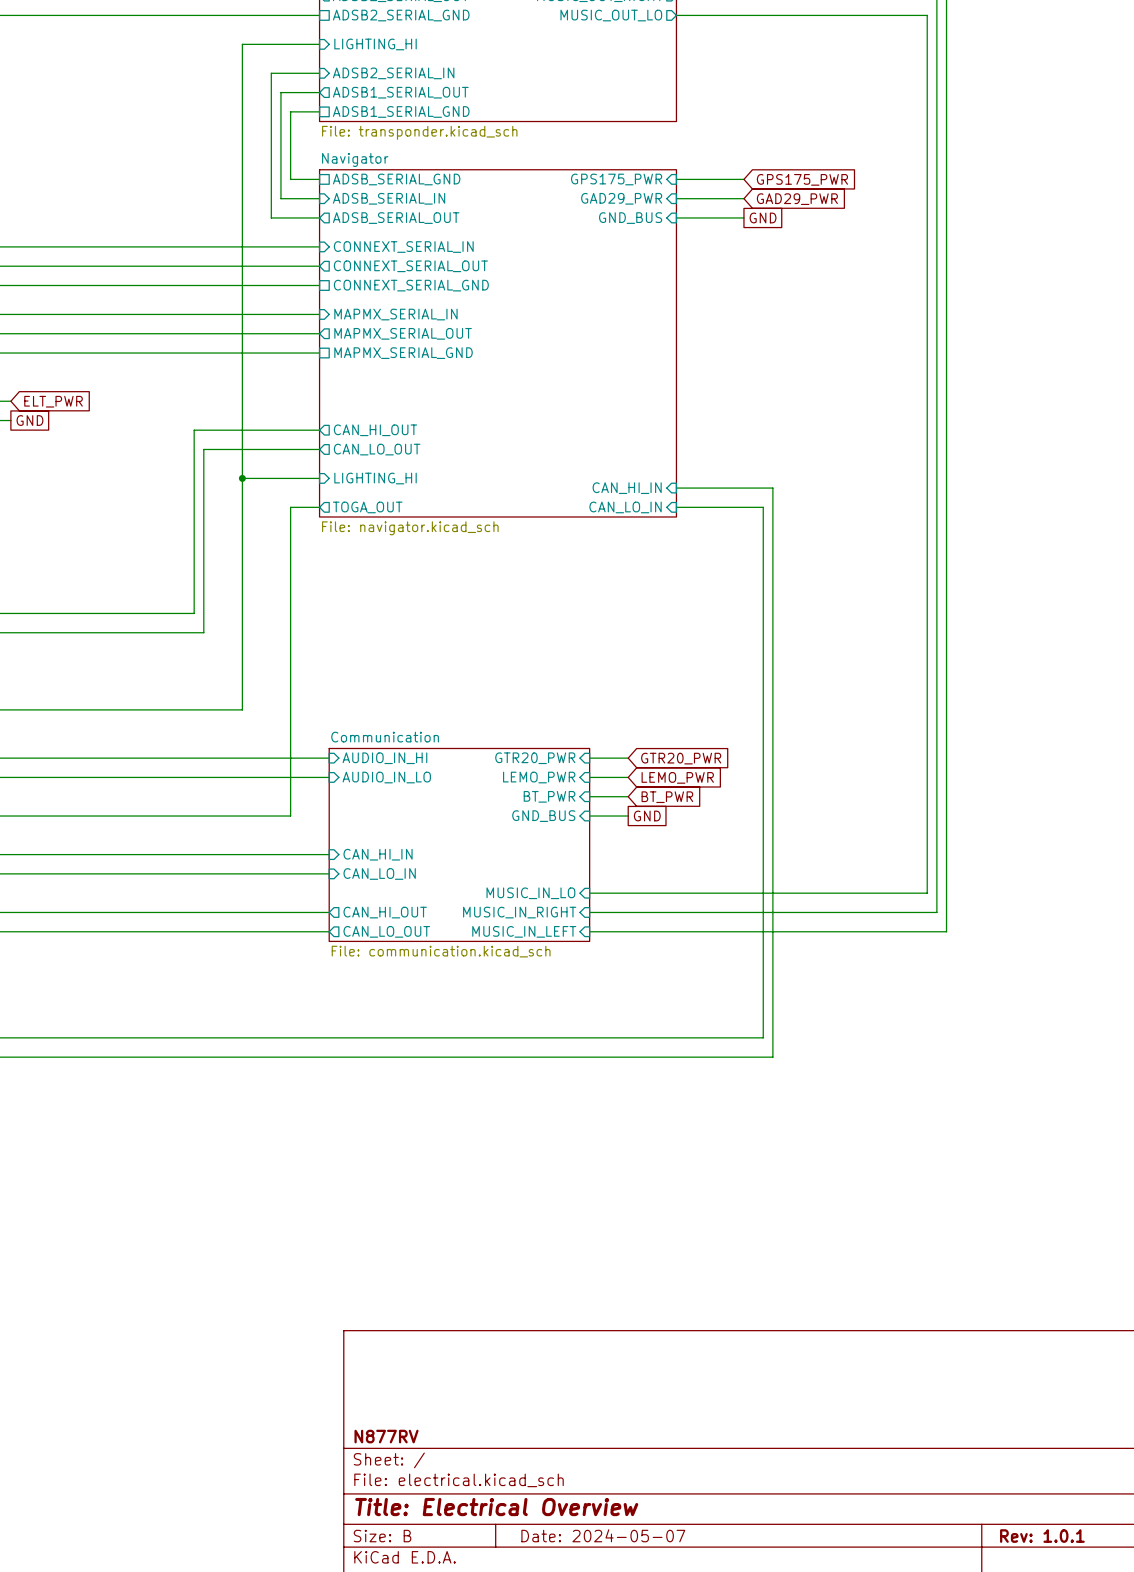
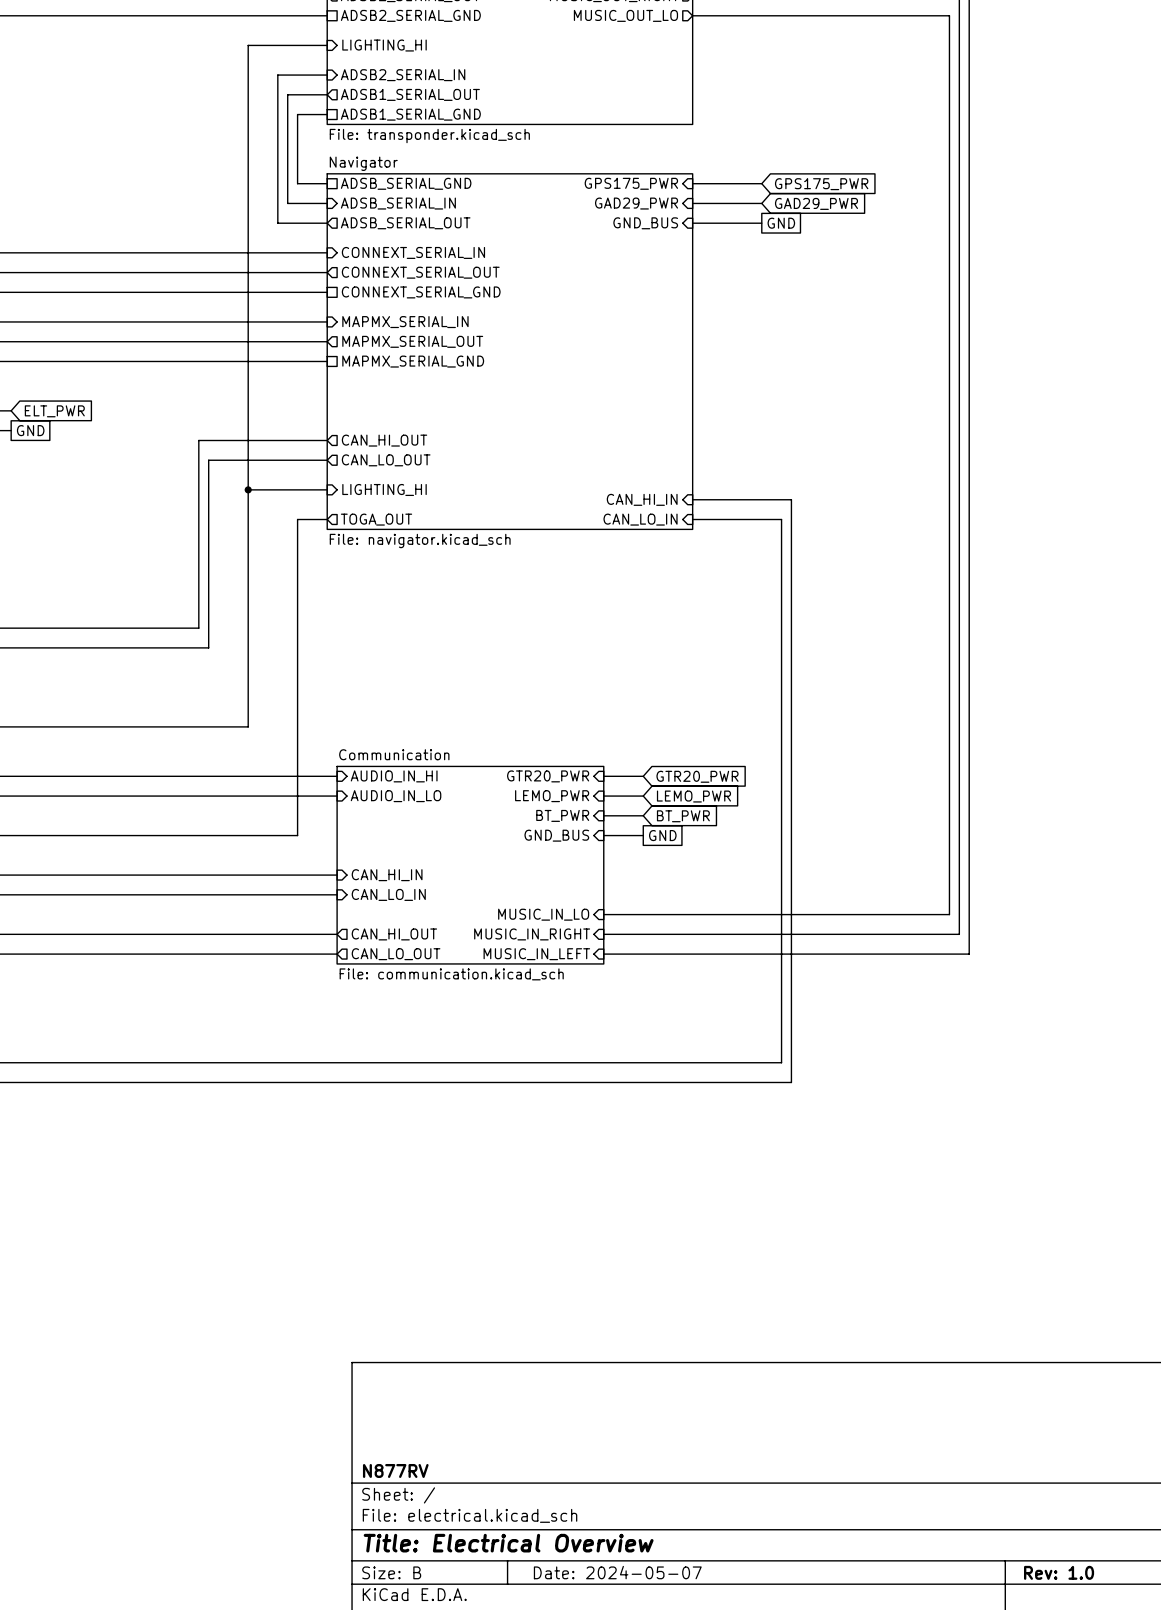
title block: Rev: 1.0.1 (1042, 1536) -> Rev: 1.0 (1059, 1572)

